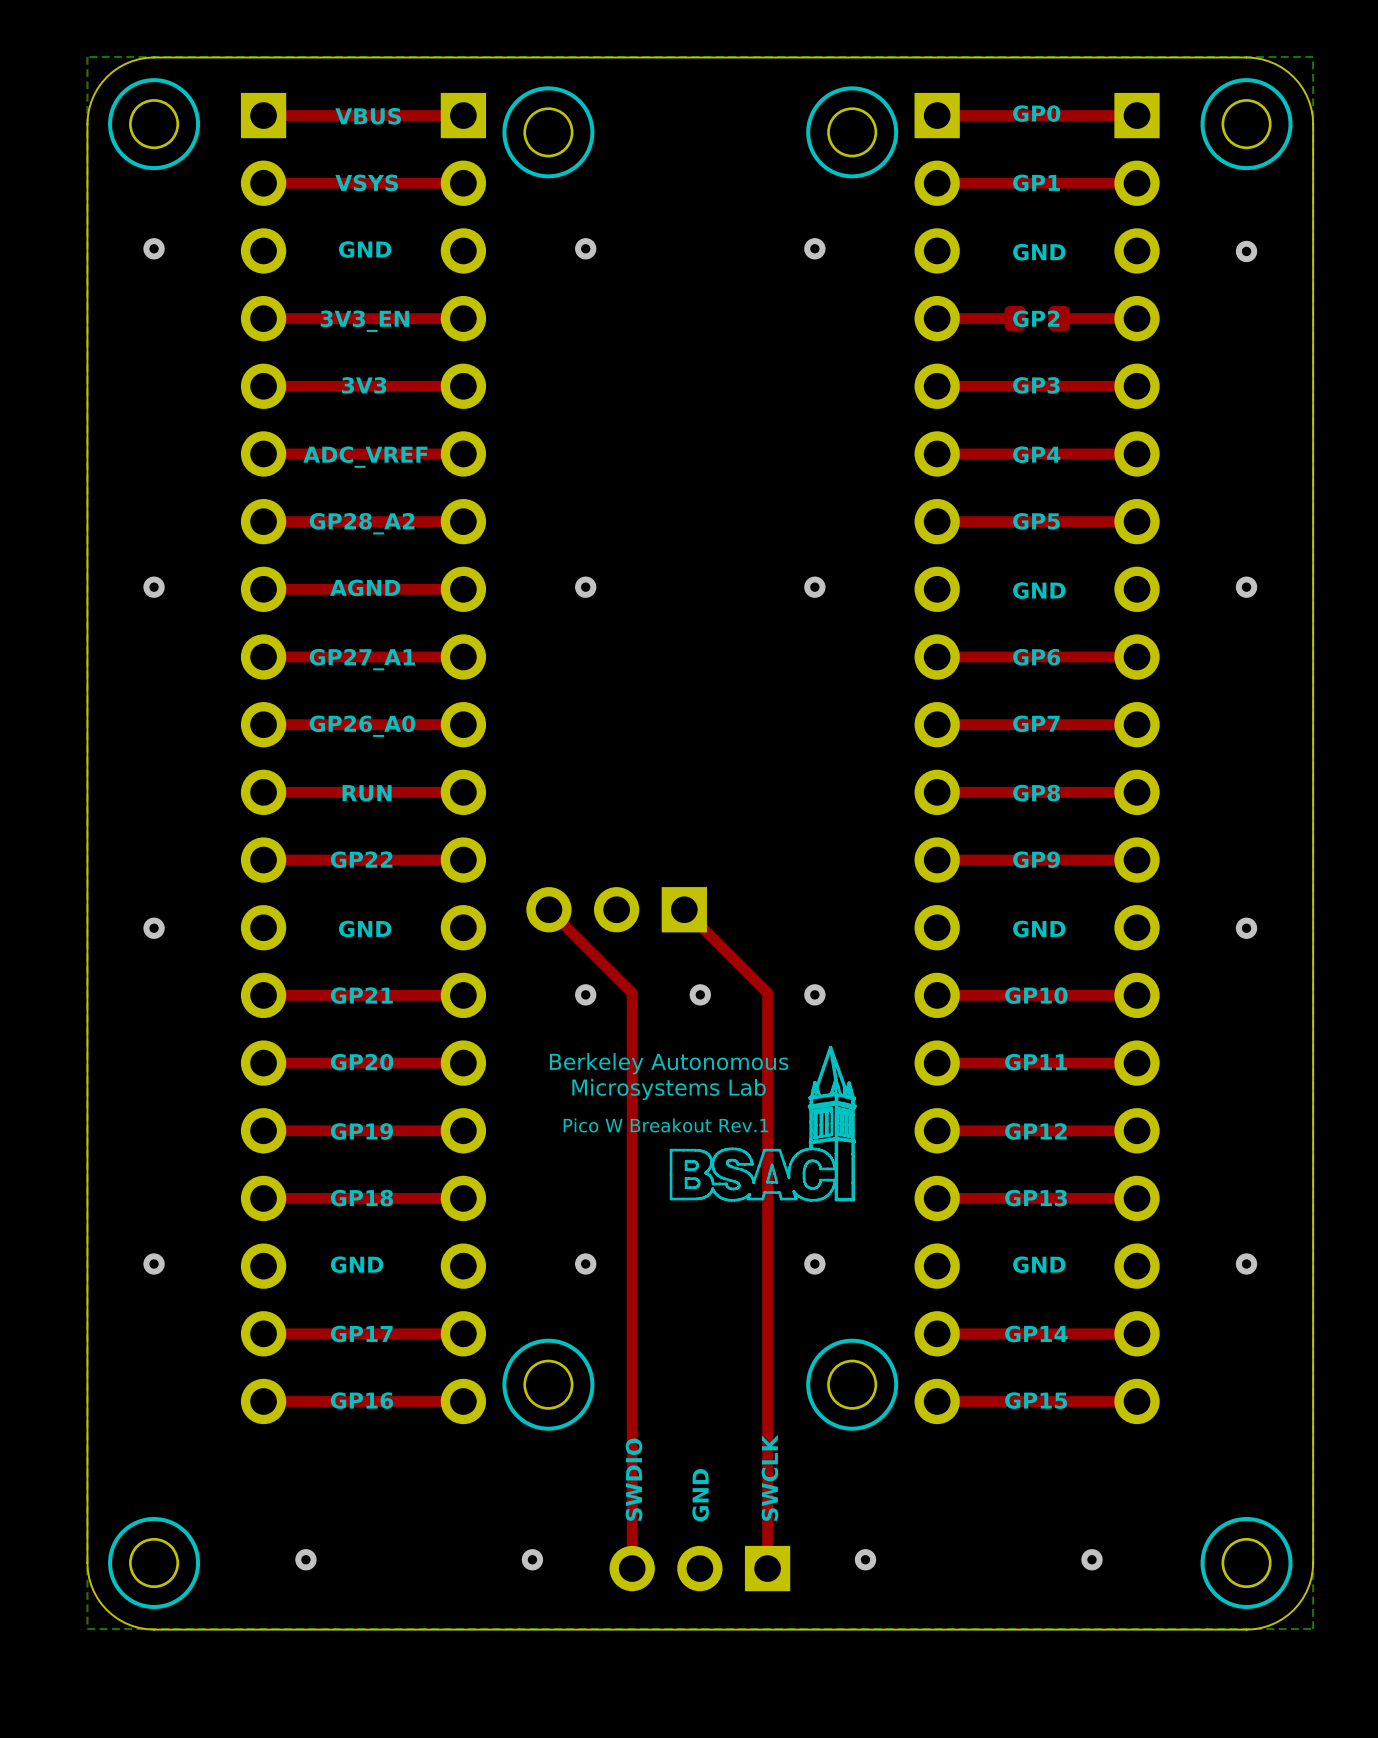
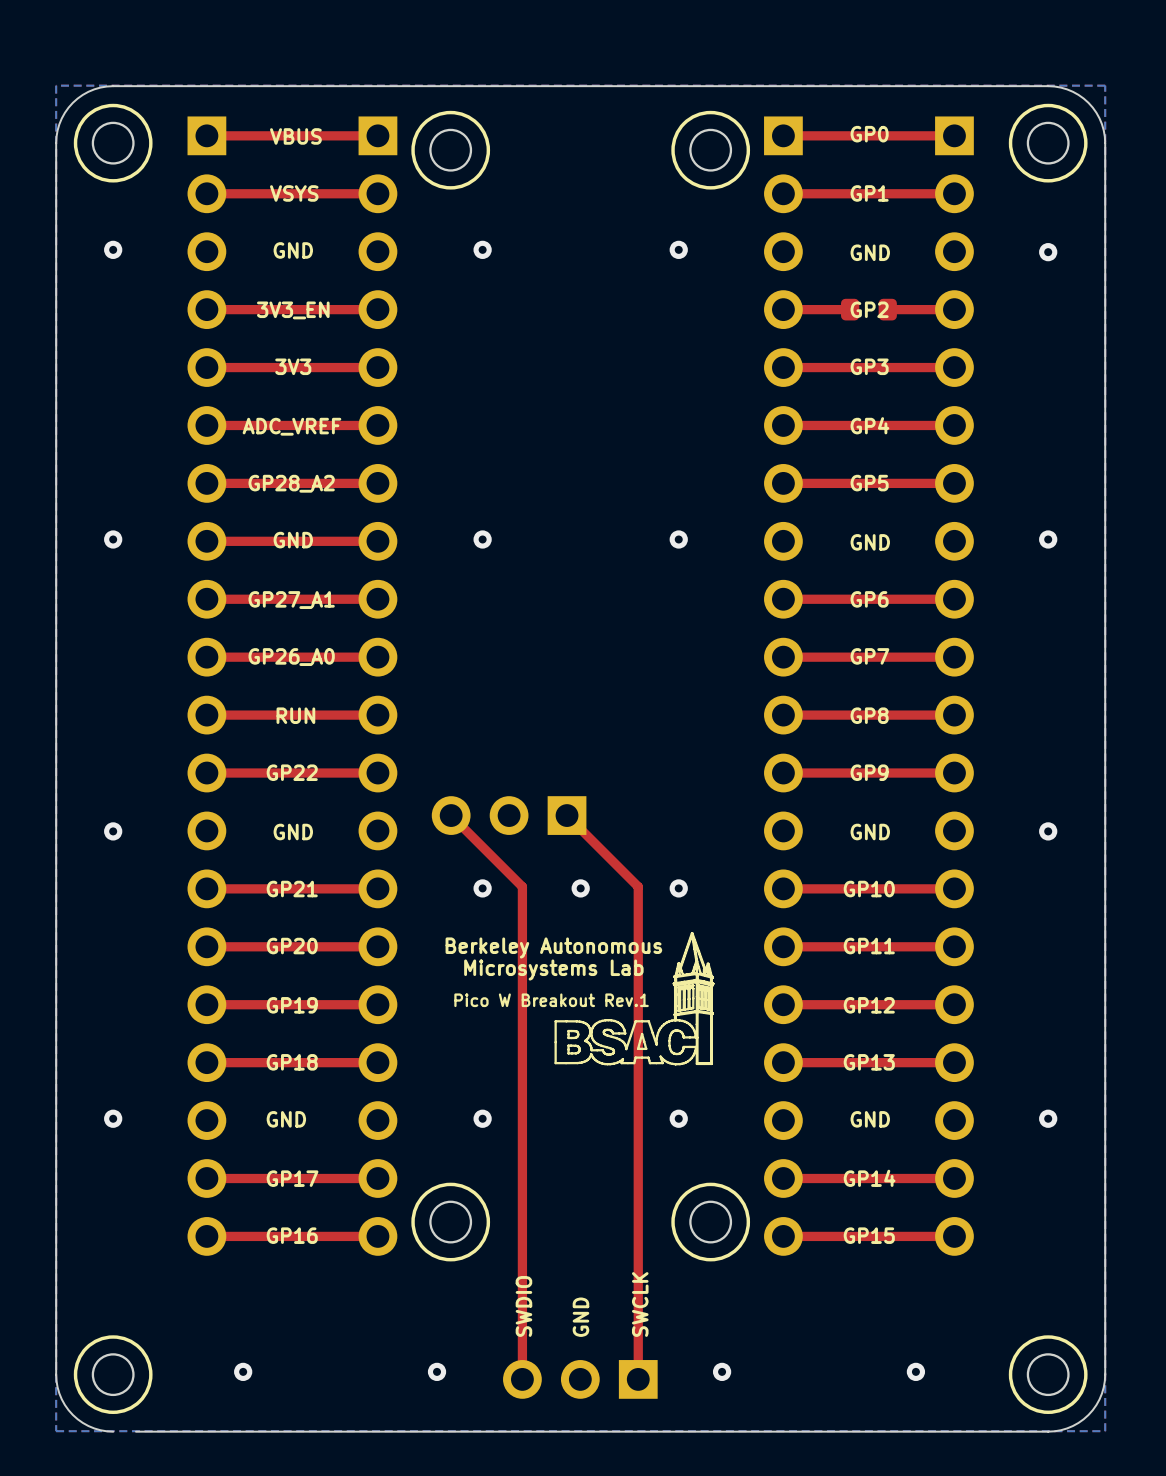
text: AGND (365, 587) -> GND (293, 540)
board edge: (180, 1629) (154, 1629) -> none

